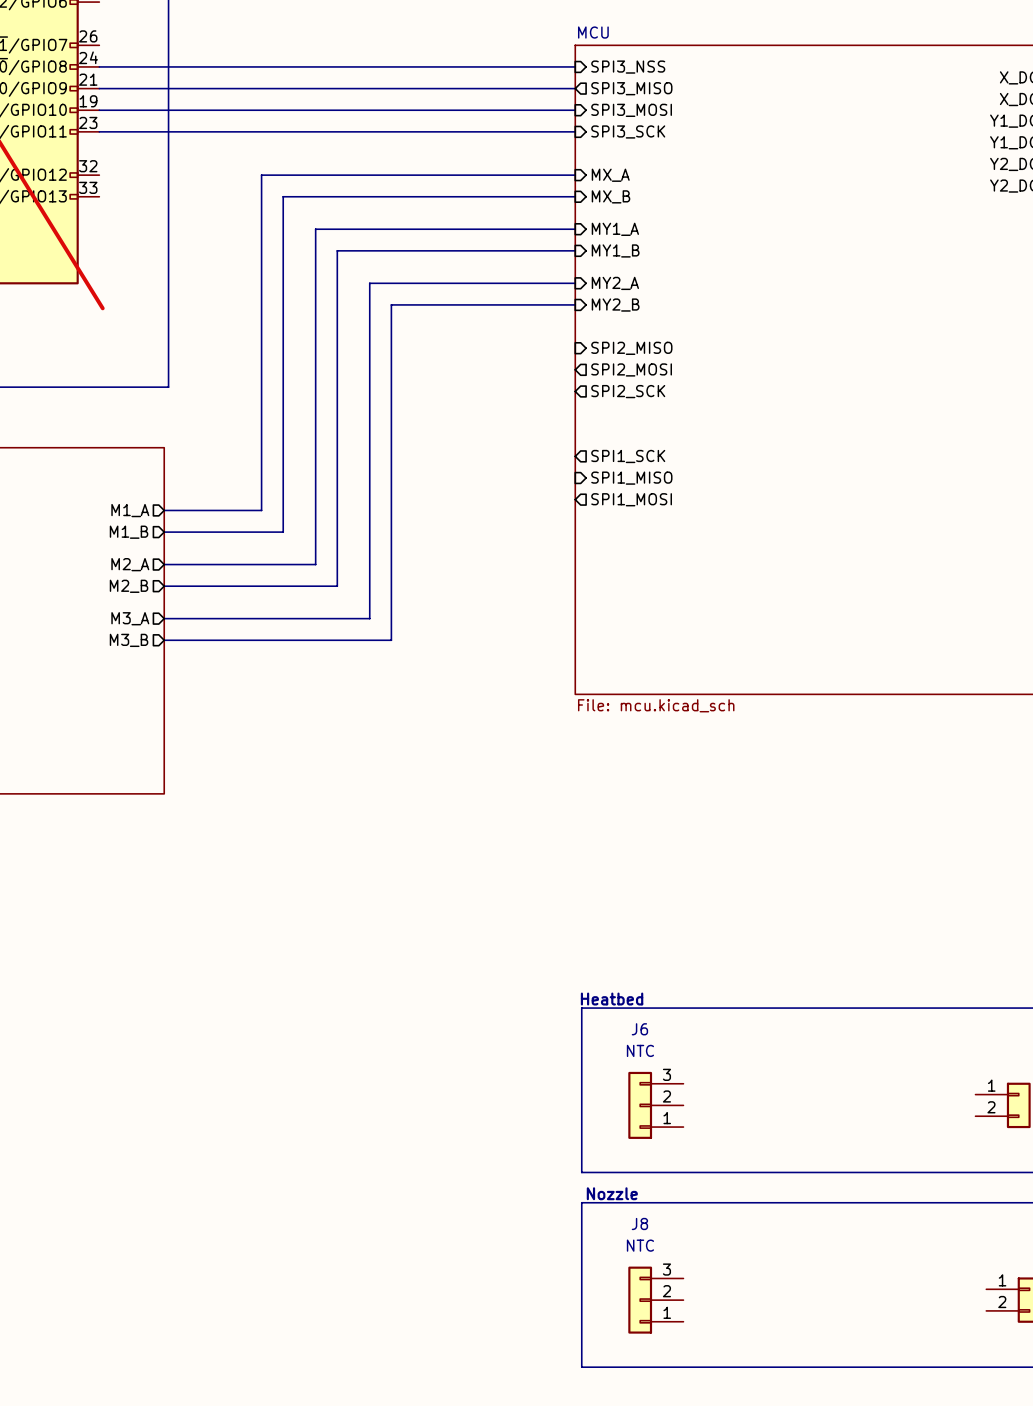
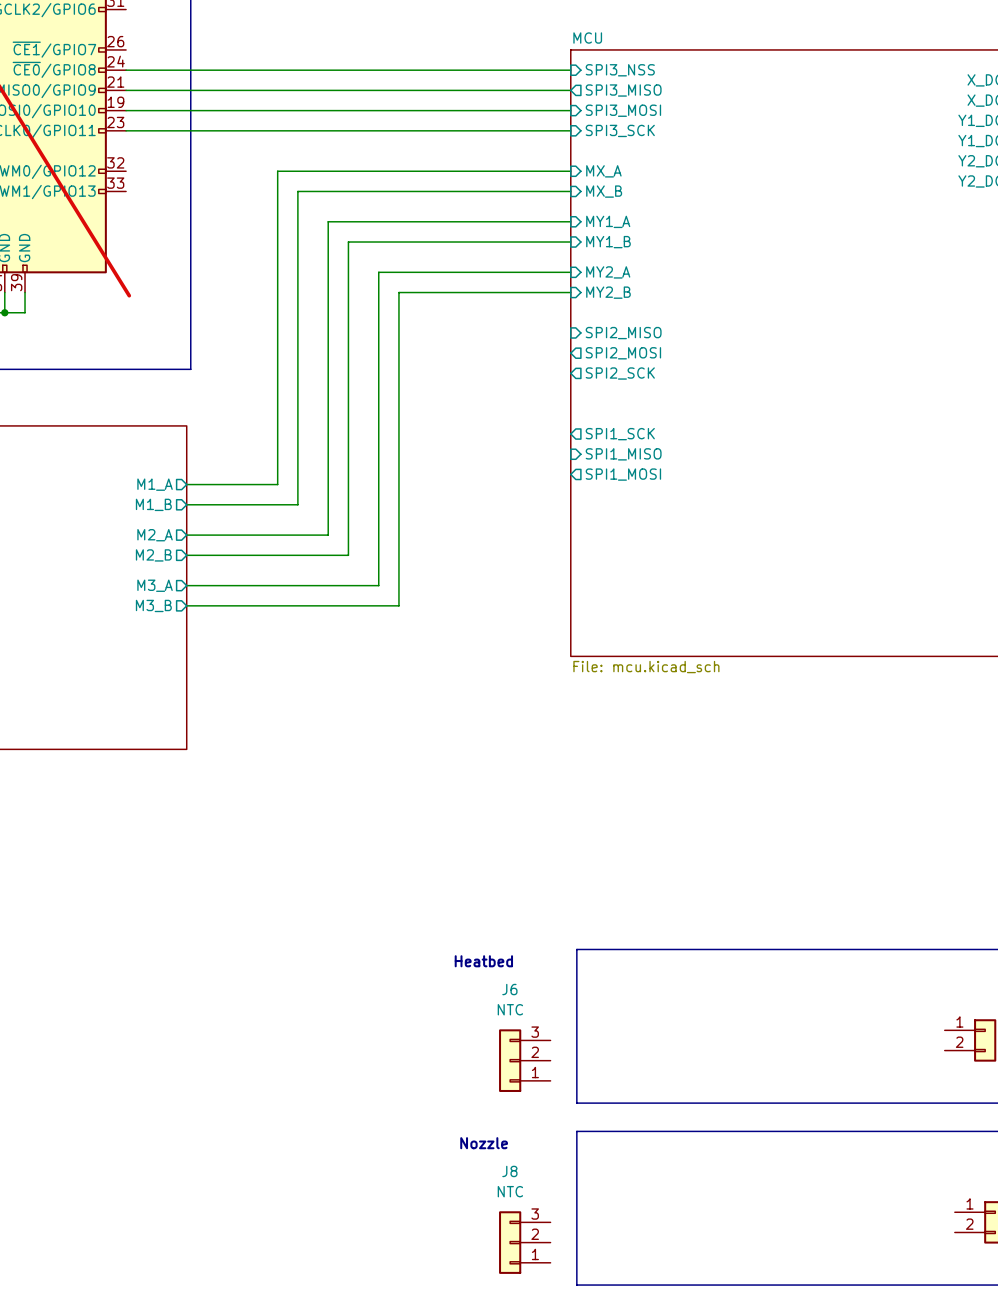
text position: Heatbed (612, 999) -> Heatbed (483, 961)
J6 position: (655, 1105) -> (524, 1060)
text position: Nozzle (612, 1193) -> Nozzle (484, 1143)
J8 position: (655, 1300) -> (524, 1242)

